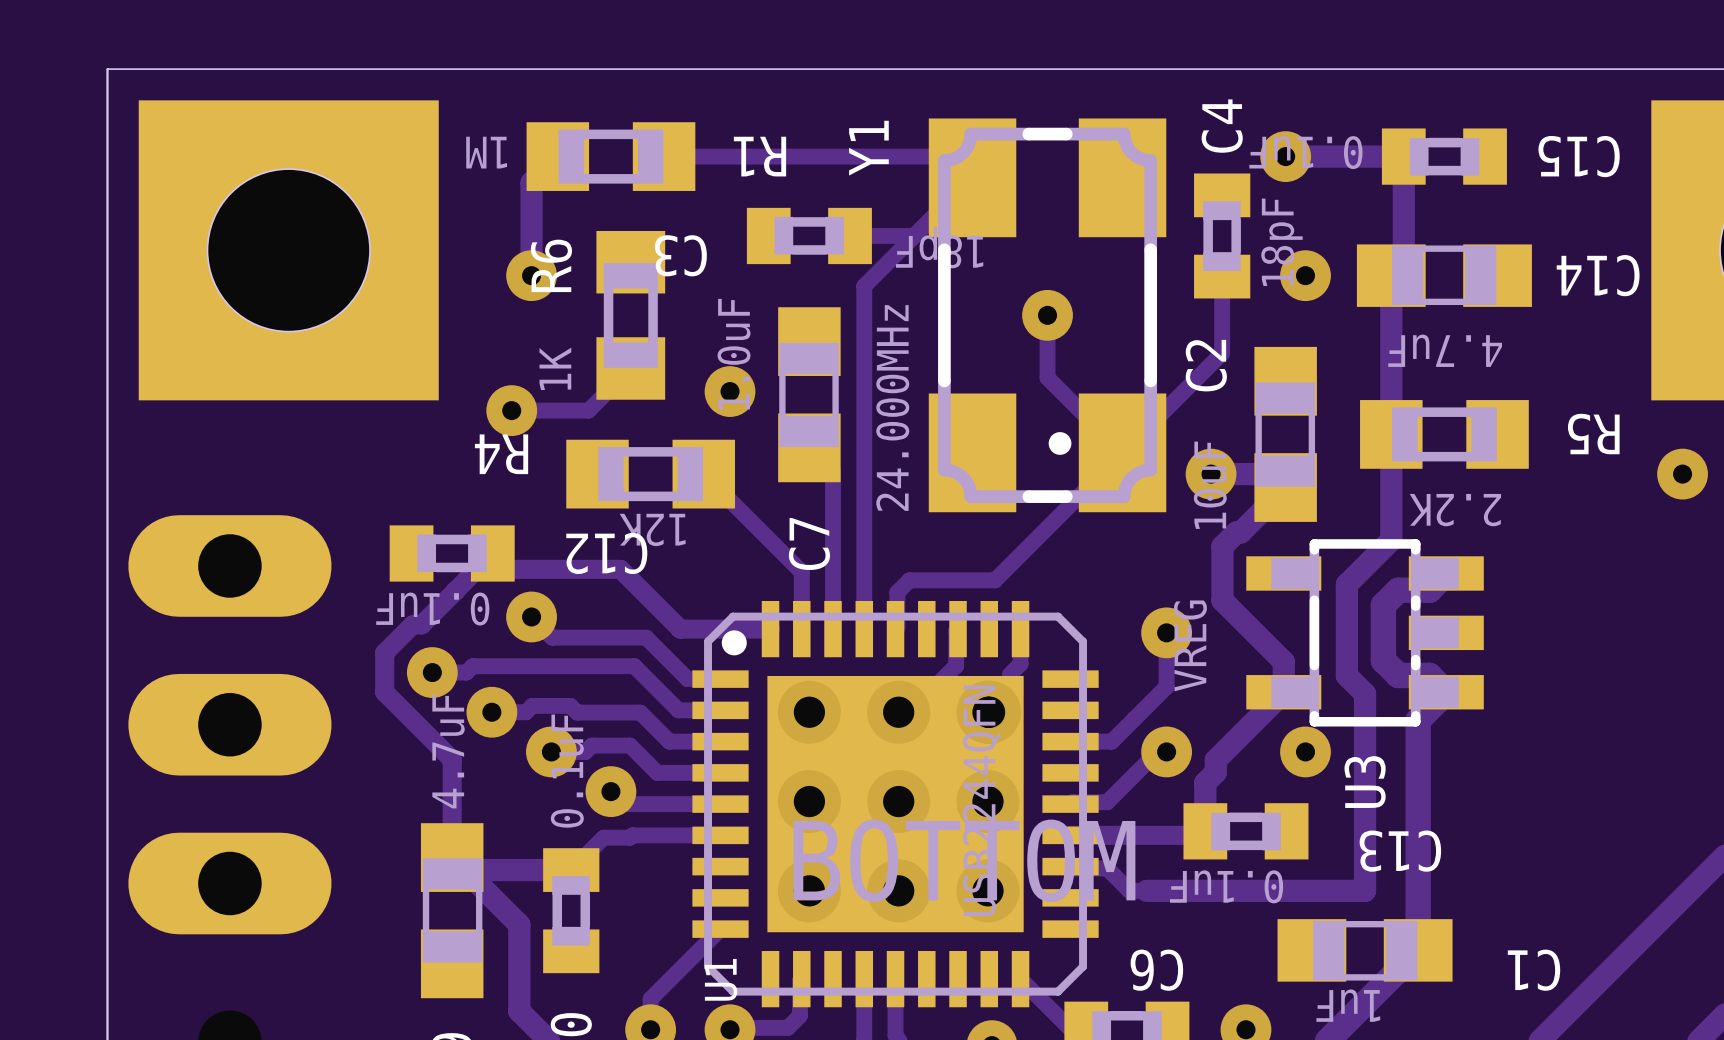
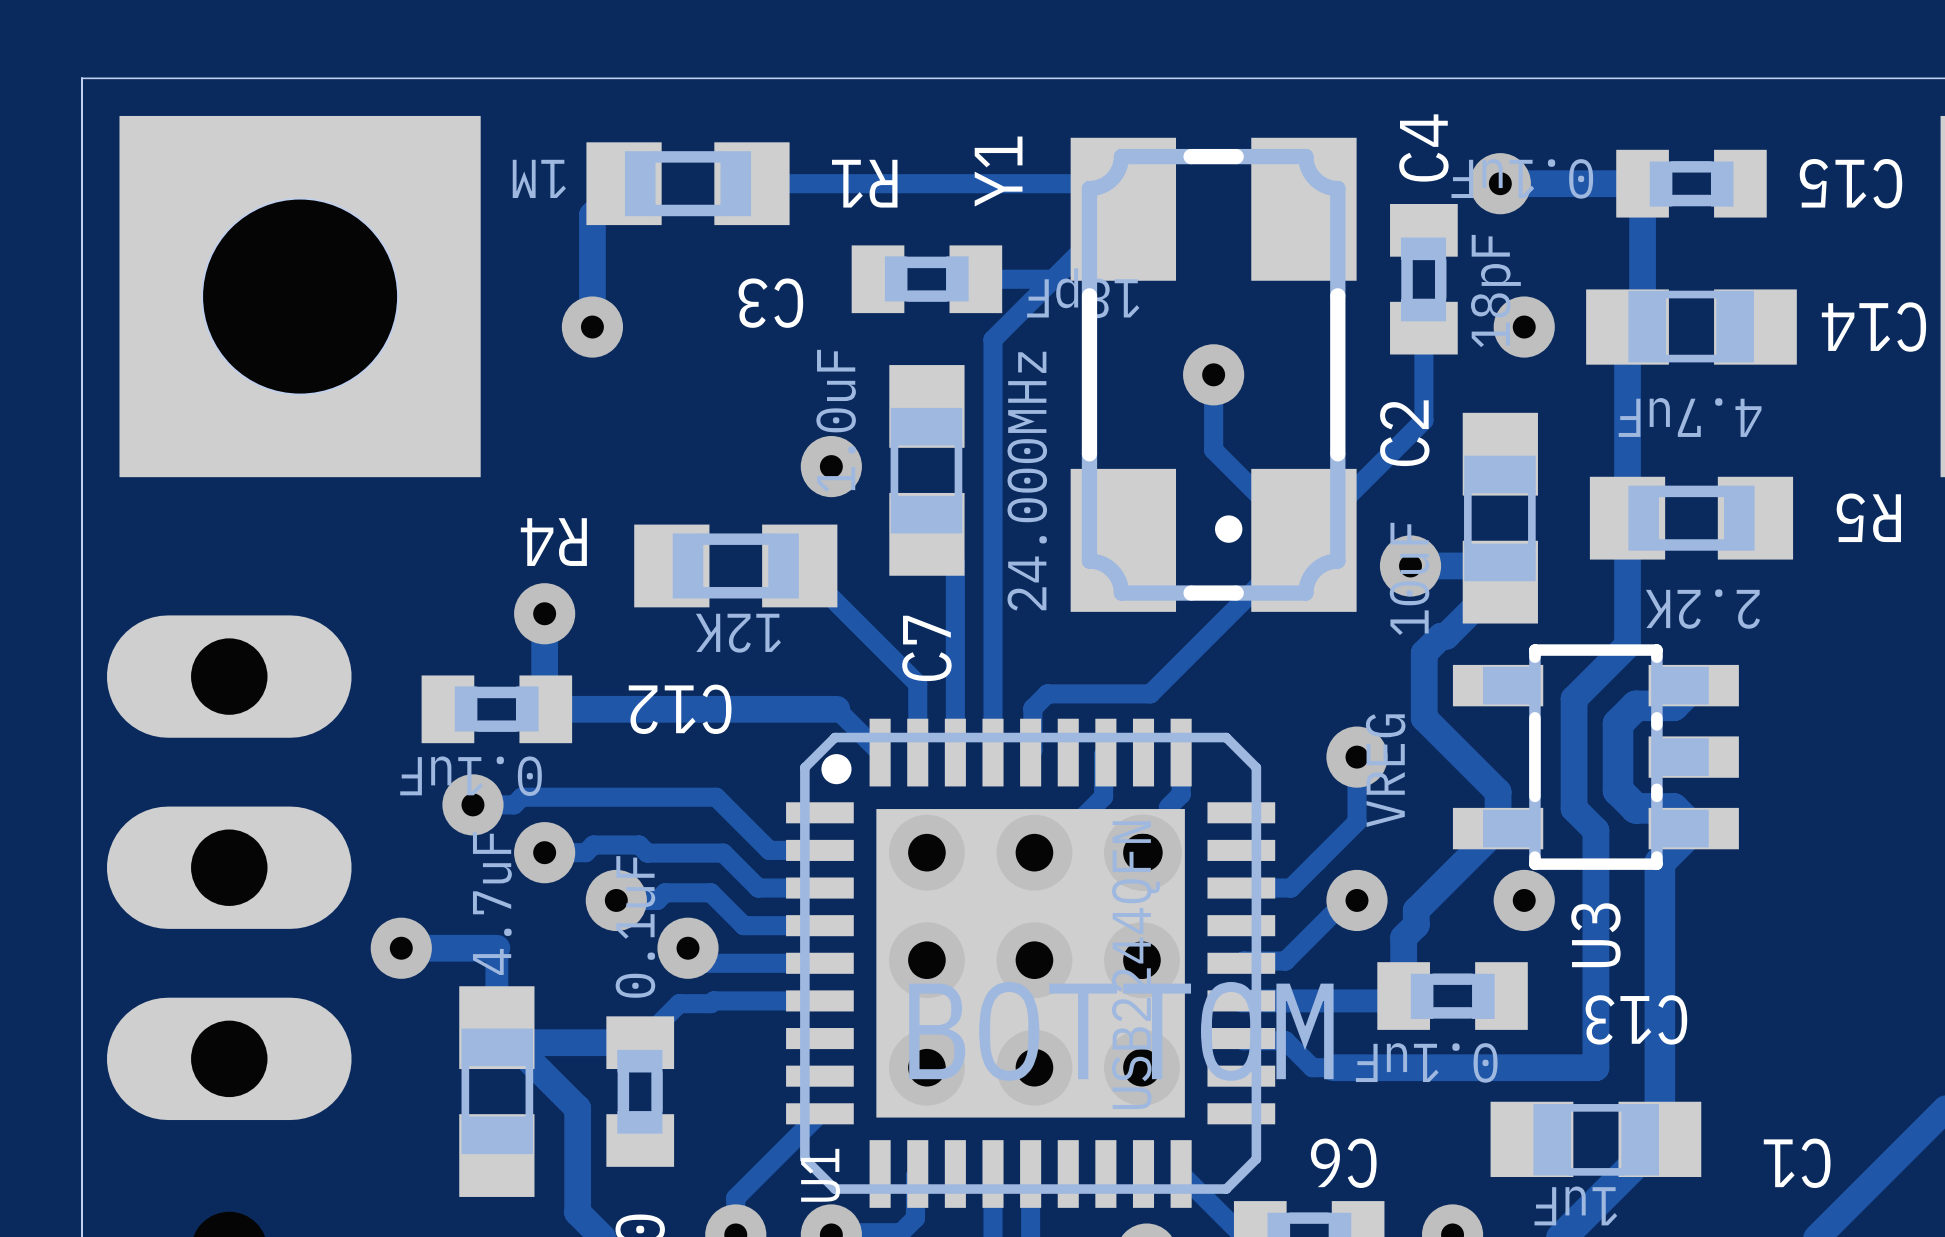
R6: 1K (630, 315) -> none
track: (630, 368) (588, 410) (511, 410) -> none
via: (511, 410) -> none
via: none -> (544, 613)
C12 position: (452, 553) -> (496, 709)
track: (531, 616) (552, 637) (646, 637) (687, 679) (720, 679) -> none
via: (531, 616) -> none
track: (770, 629) (680, 629) (620, 569) (508, 569) (492, 553) (421, 624) (412, 624) (384, 652) (384, 692) (452, 759) (452, 791) -> (880, 752) (836, 709) (544, 709) (544, 613)
via: none -> (401, 948)
track: none -> (496, 948) (401, 948)

